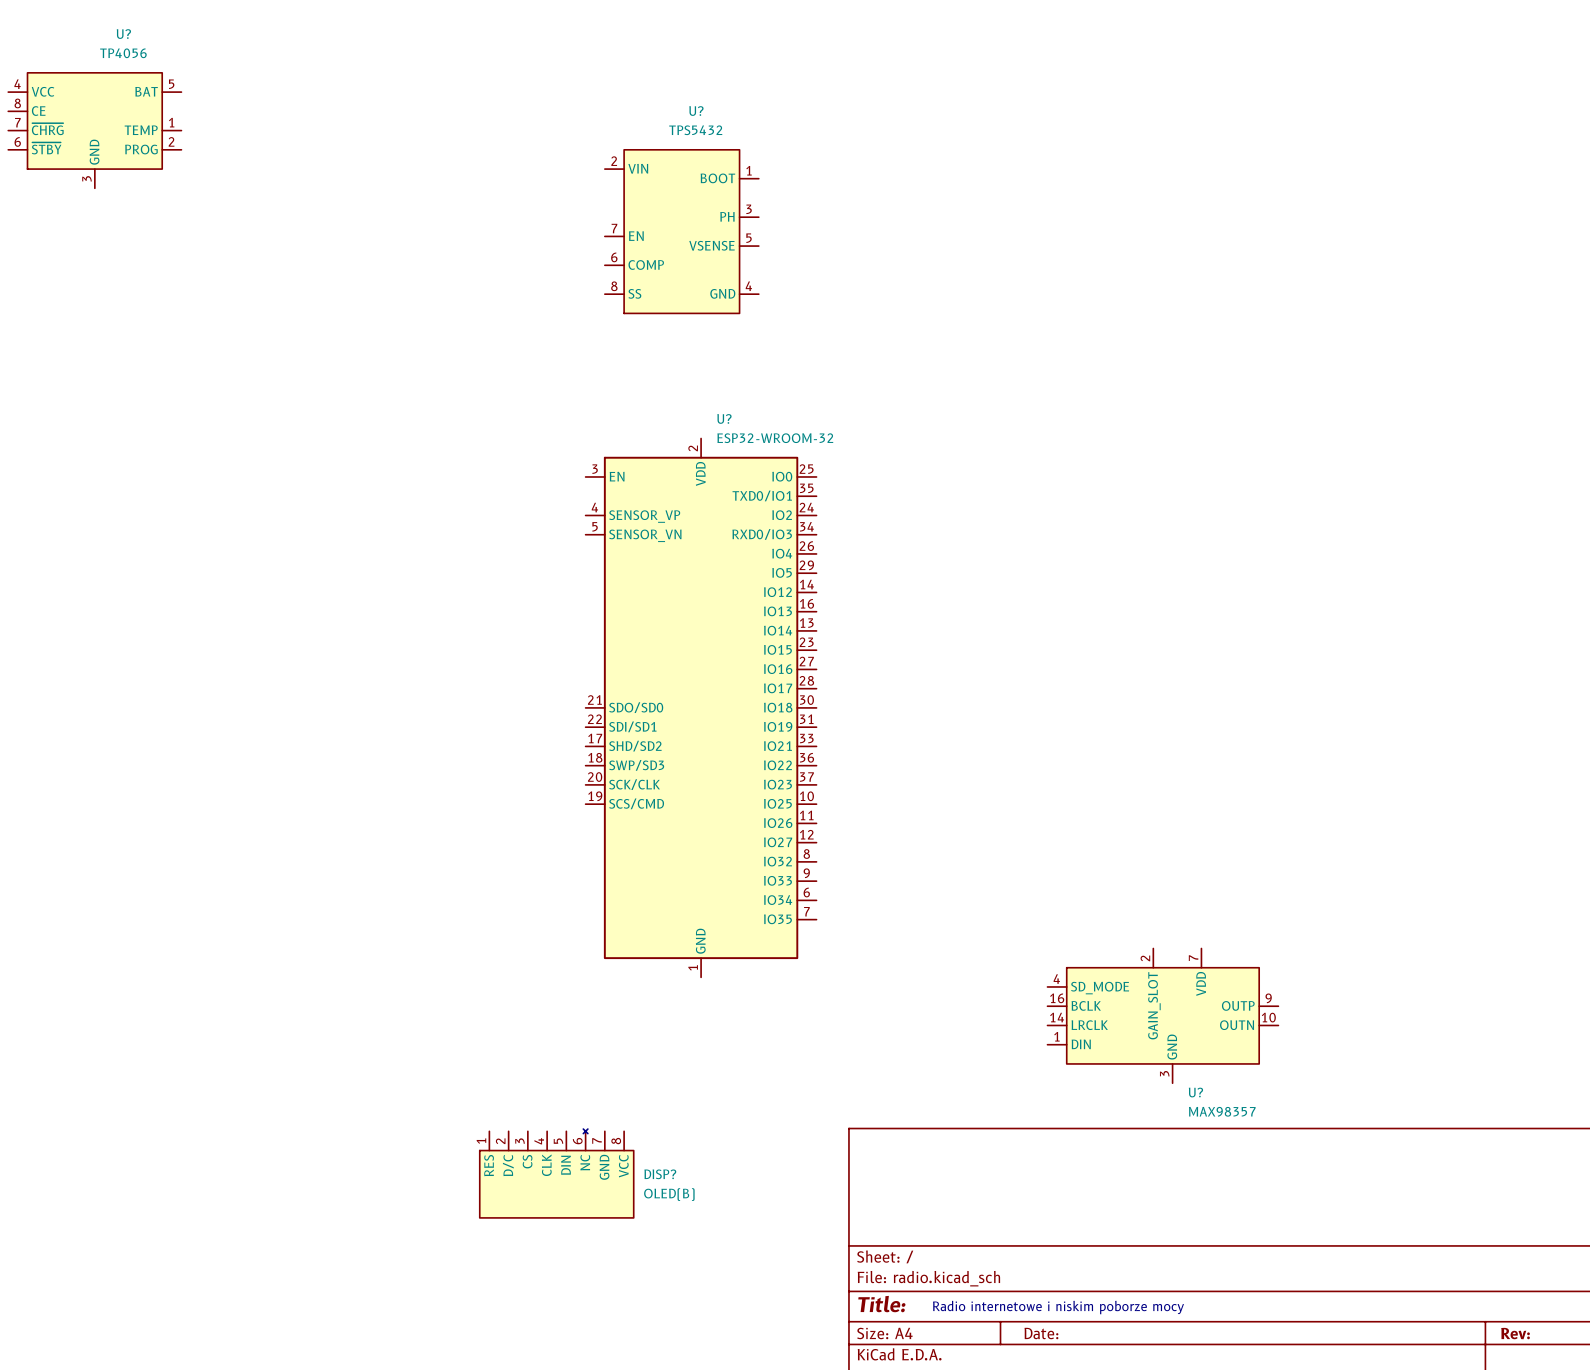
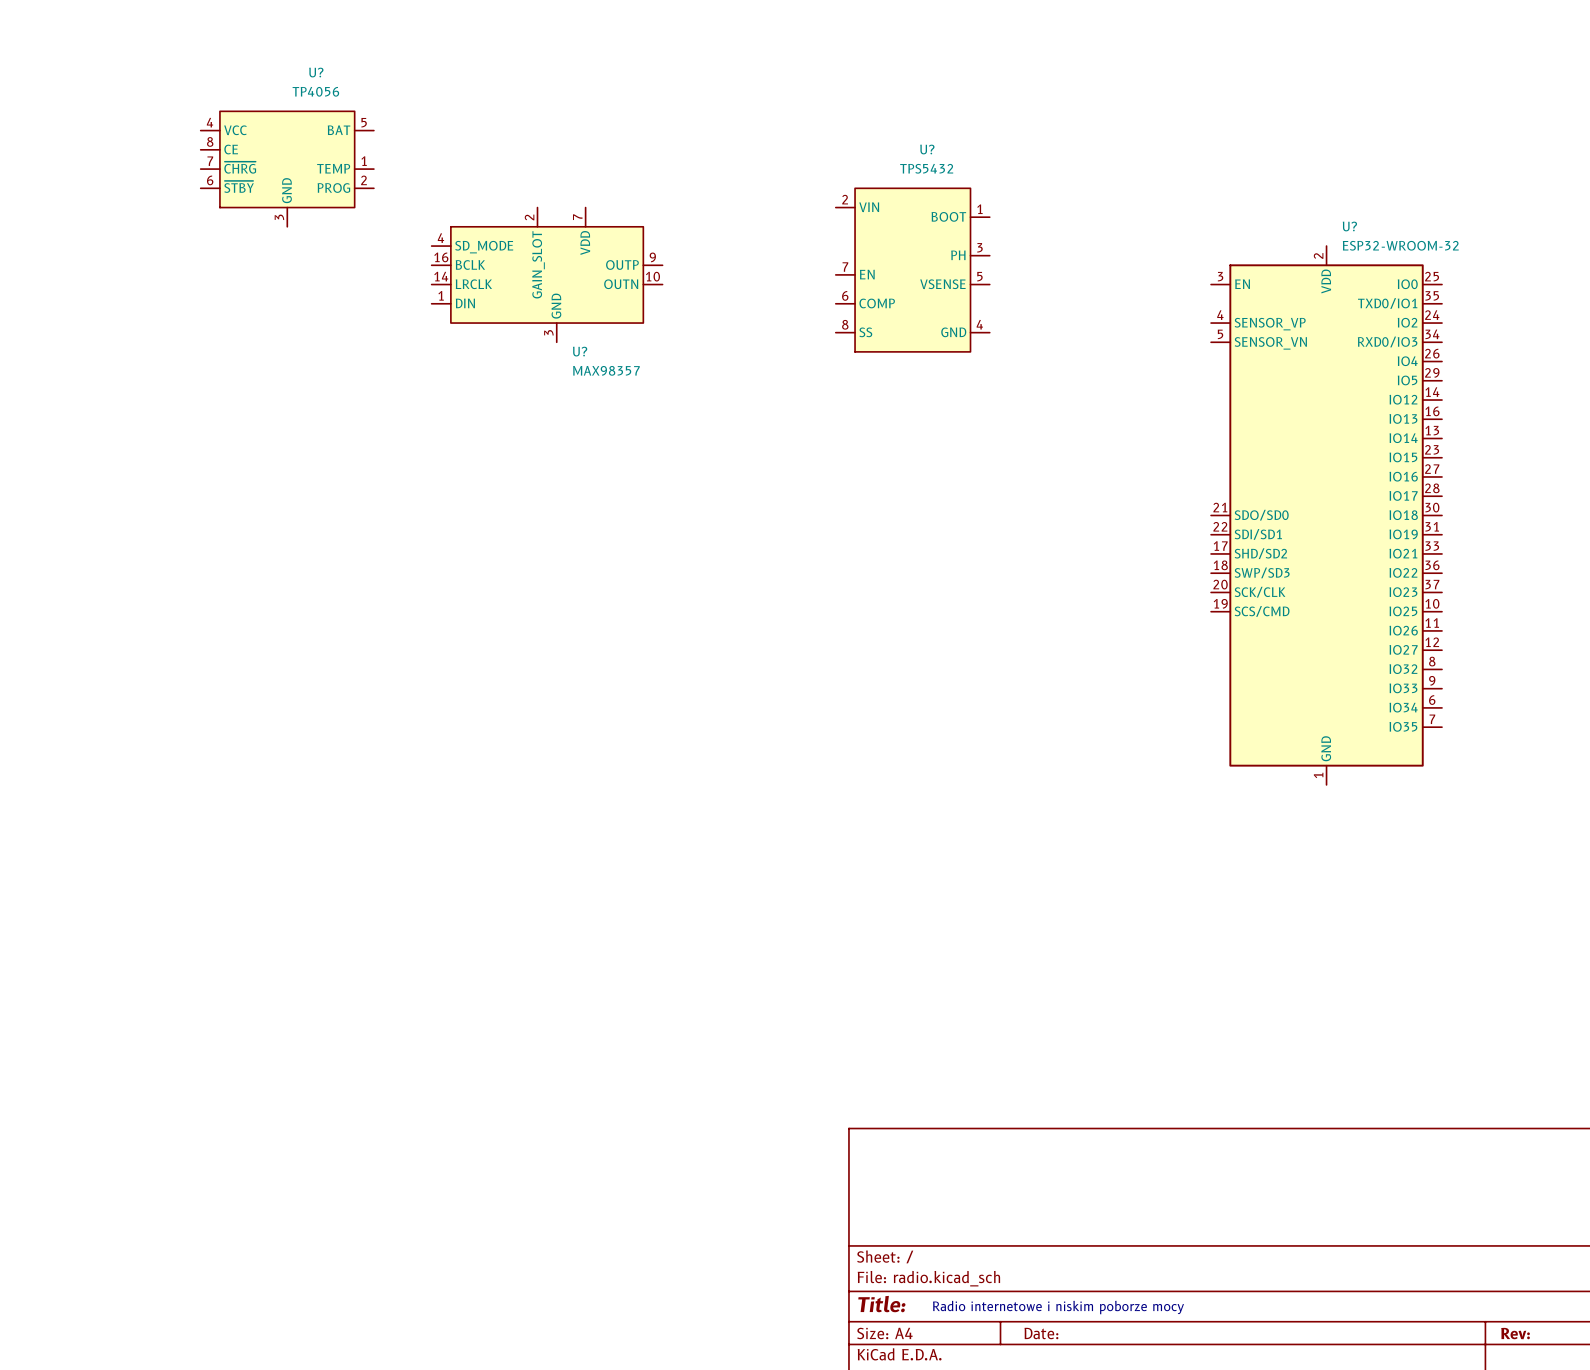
U?: TP4056 (114, 130) -> none
U?: none -> TP4056 (306, 169)
U?: TPS5432 (686, 231) -> none
U?: none -> TPS5432 (917, 270)
U?: none -> MAX98357 (547, 274)
U?: none -> ESP32-WROOM-32 (1326, 515)
U?: ESP32-WROOM-32 (701, 707) -> none
U?: MAX98357 (1162, 1015) -> none
DISP?: OLED(B) (556, 1173) -> none

